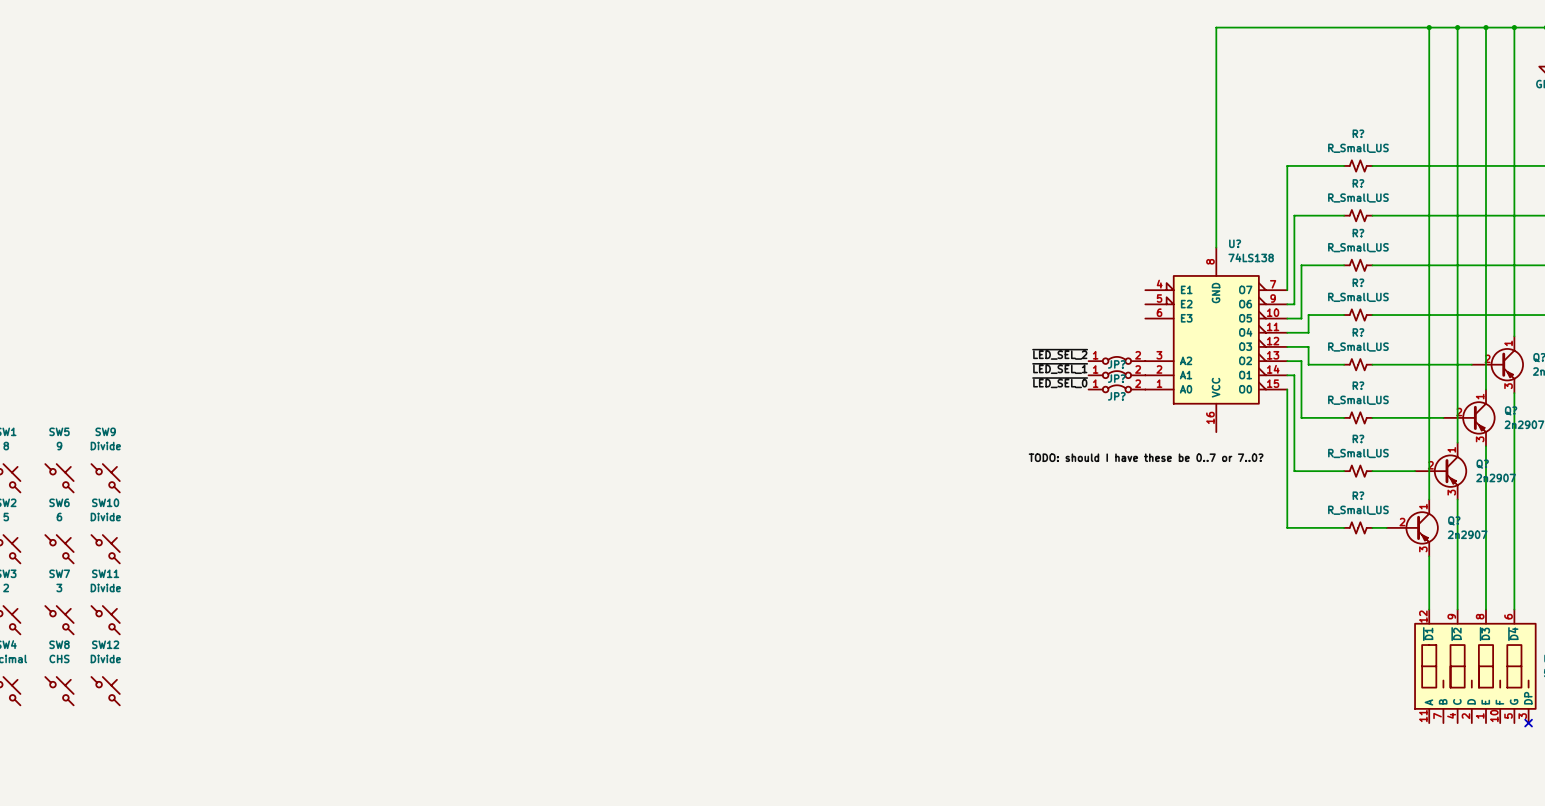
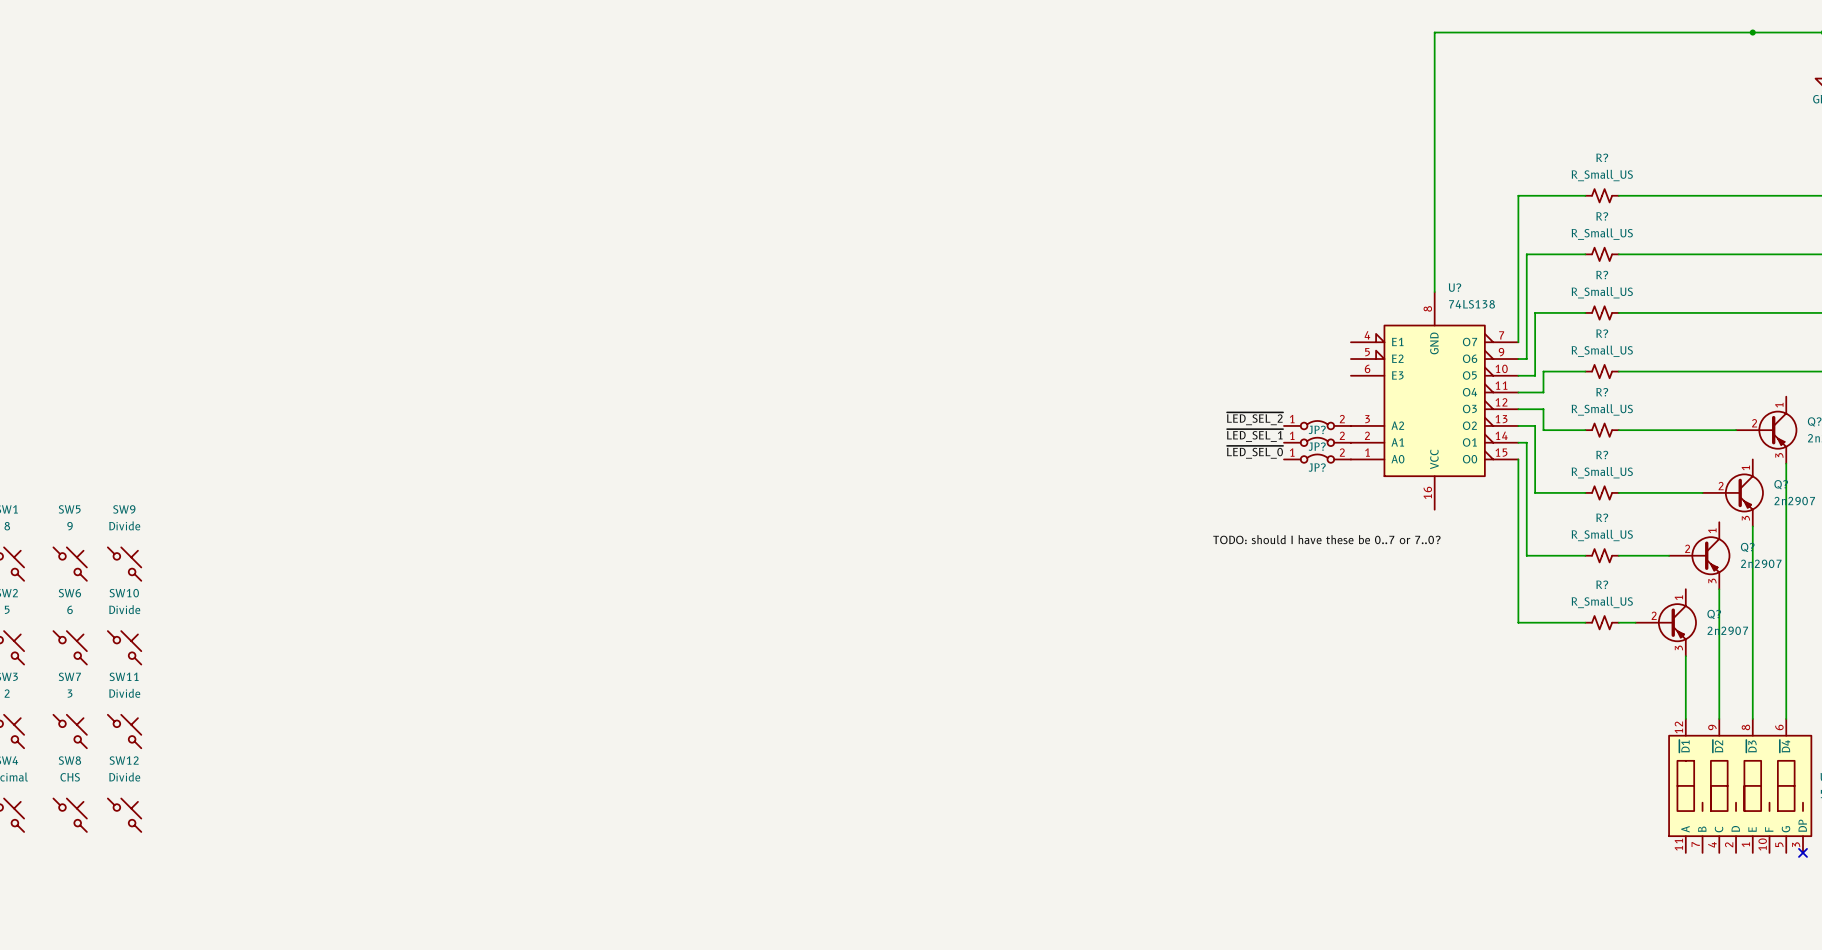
wire: (1429, 27) (1429, 499) -> none
junction: (1429, 27) -> none
wire: (1457, 27) (1457, 442) -> none
junction: (1457, 27) -> none
wire: (1486, 27) (1486, 389) -> none
wire: (1514, 27) (1514, 336) -> none
junction: (1514, 27) -> none

